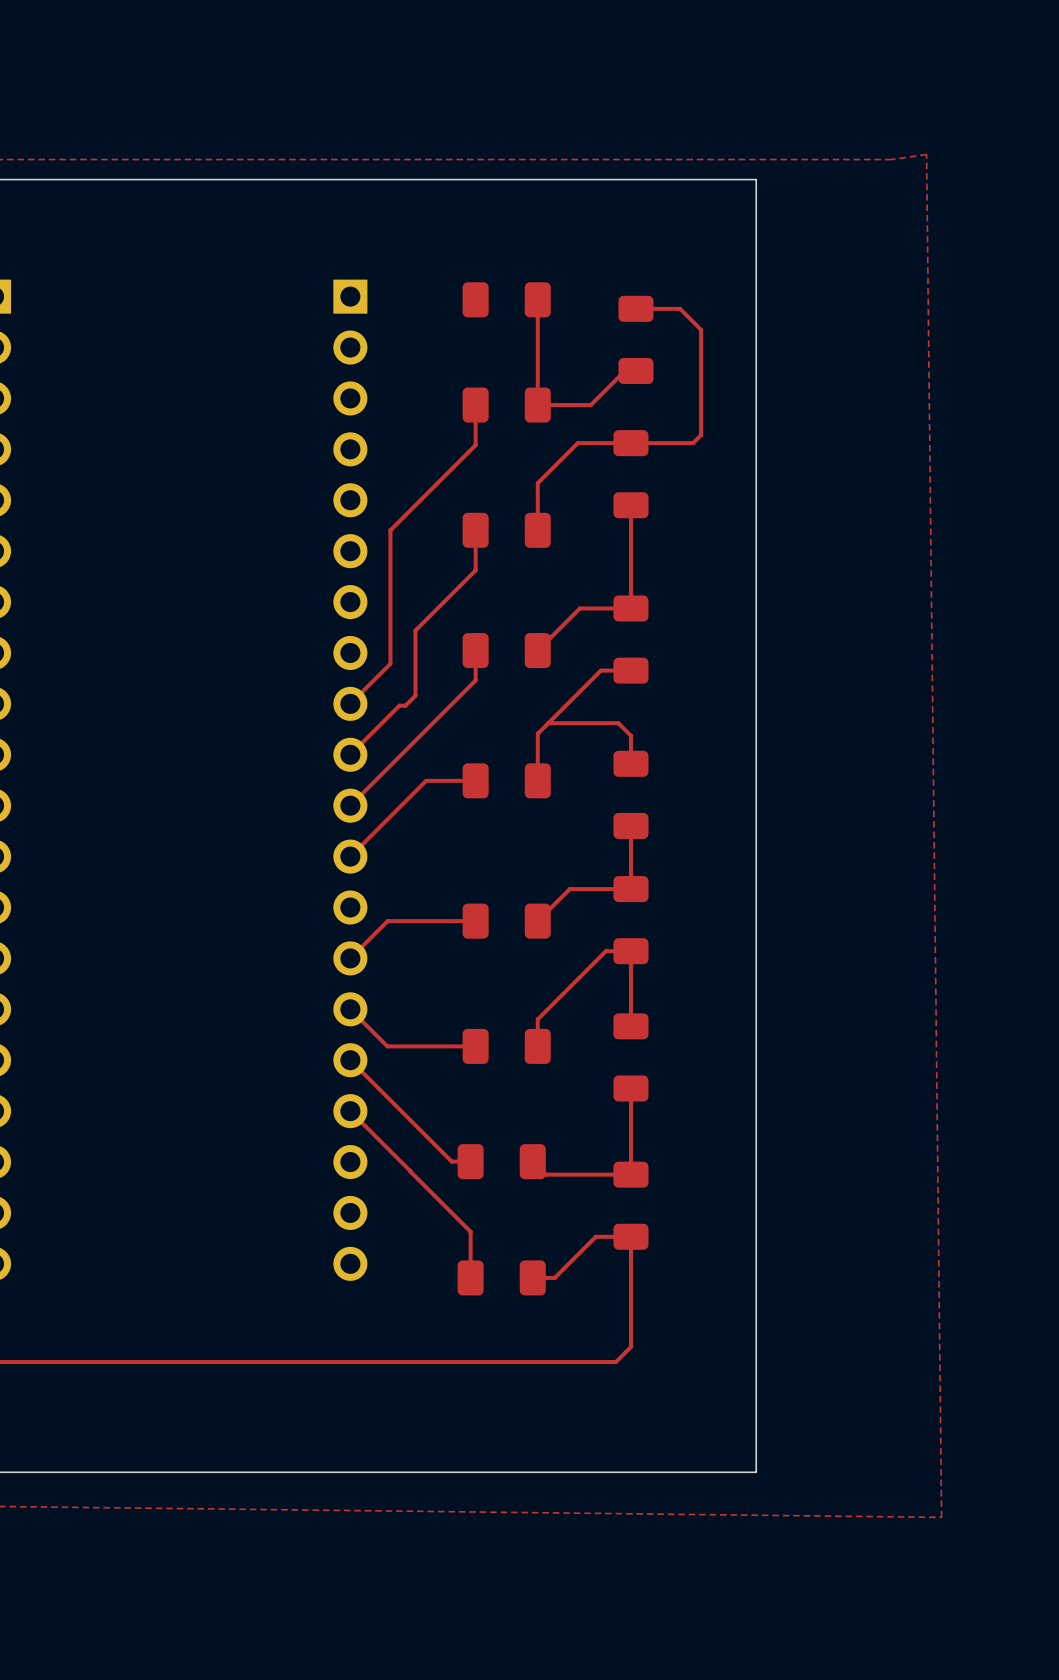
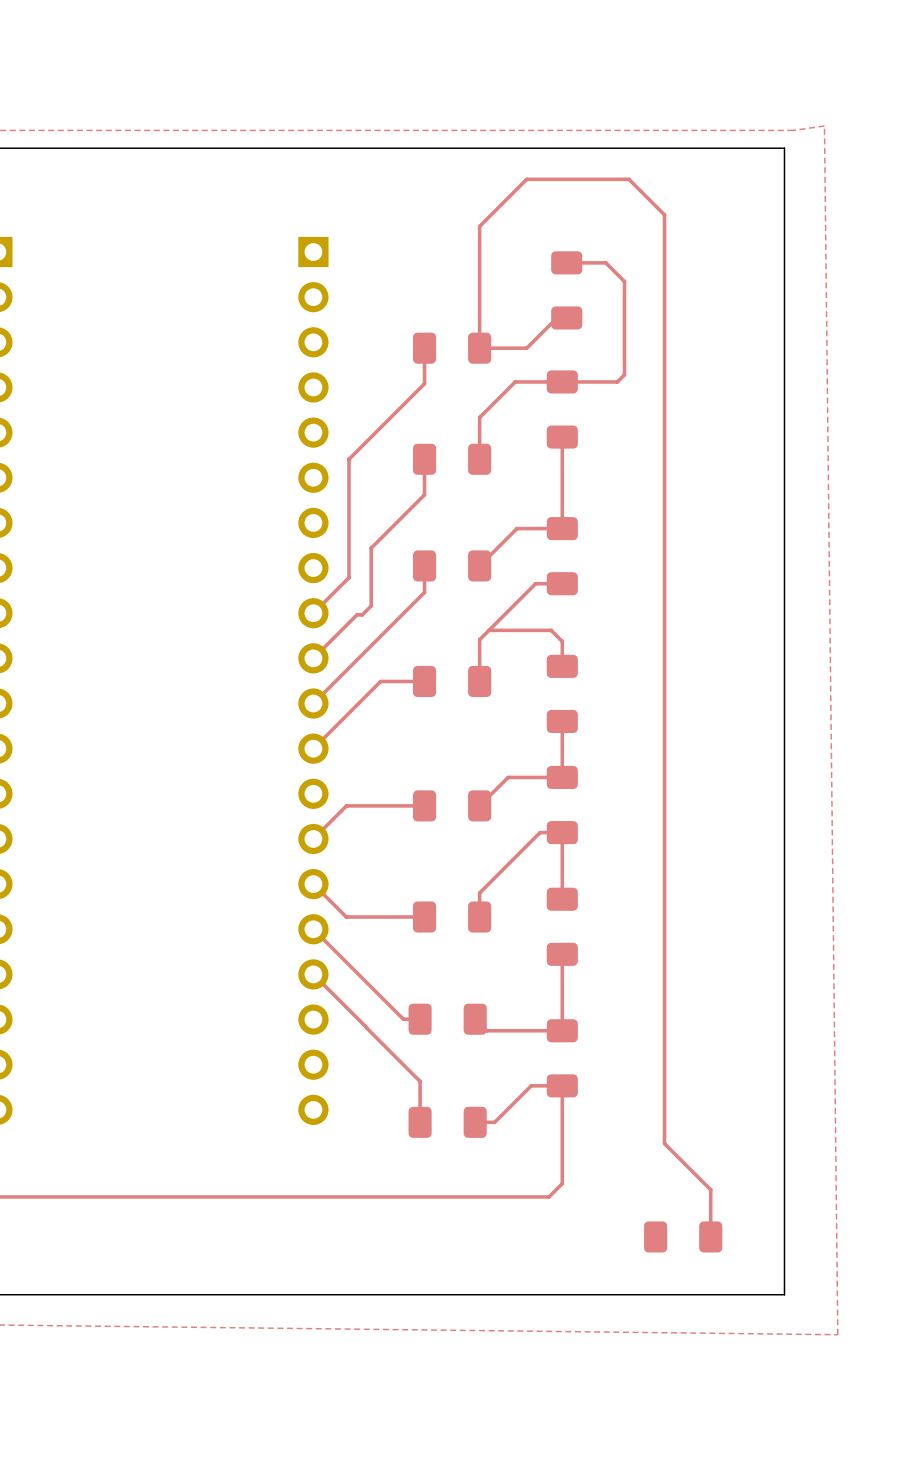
board edge: (756, 179) (756, 1472) -> (673, 148) (784, 148) (784, 1294) (673, 1294)
part: (506, 299) -> none
top track: none -> (479, 254) (479, 226) (526, 179) (628, 179) (664, 214) (664, 1143) (710, 1189) (710, 1236)
part: none -> (683, 1236)

